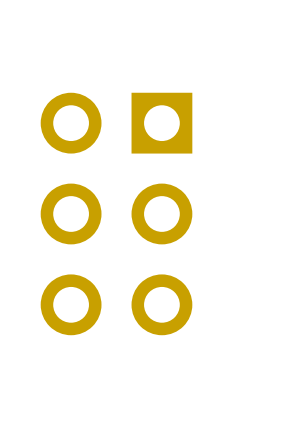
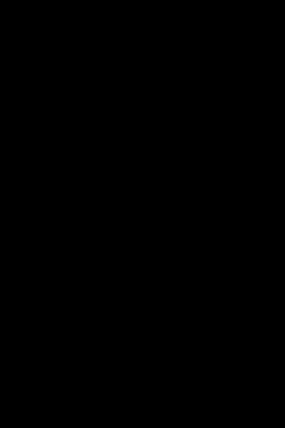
part: (116, 213) -> none

